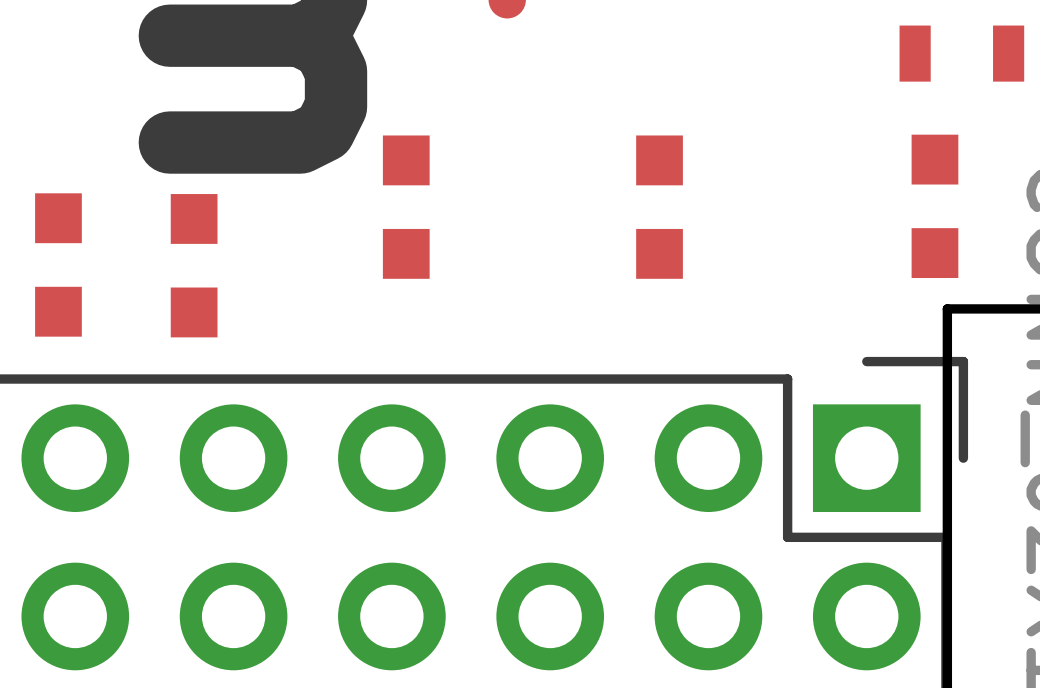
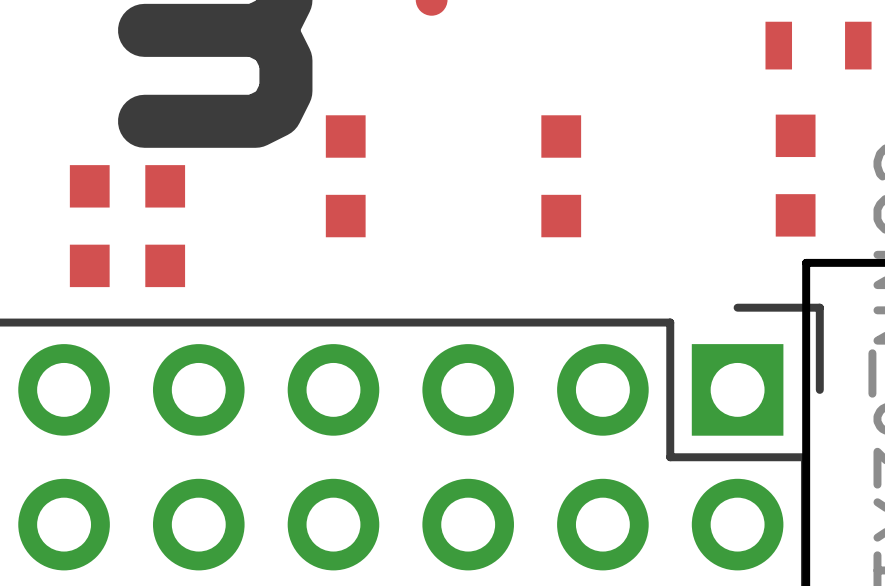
part position: (58, 264) -> (89, 226)

